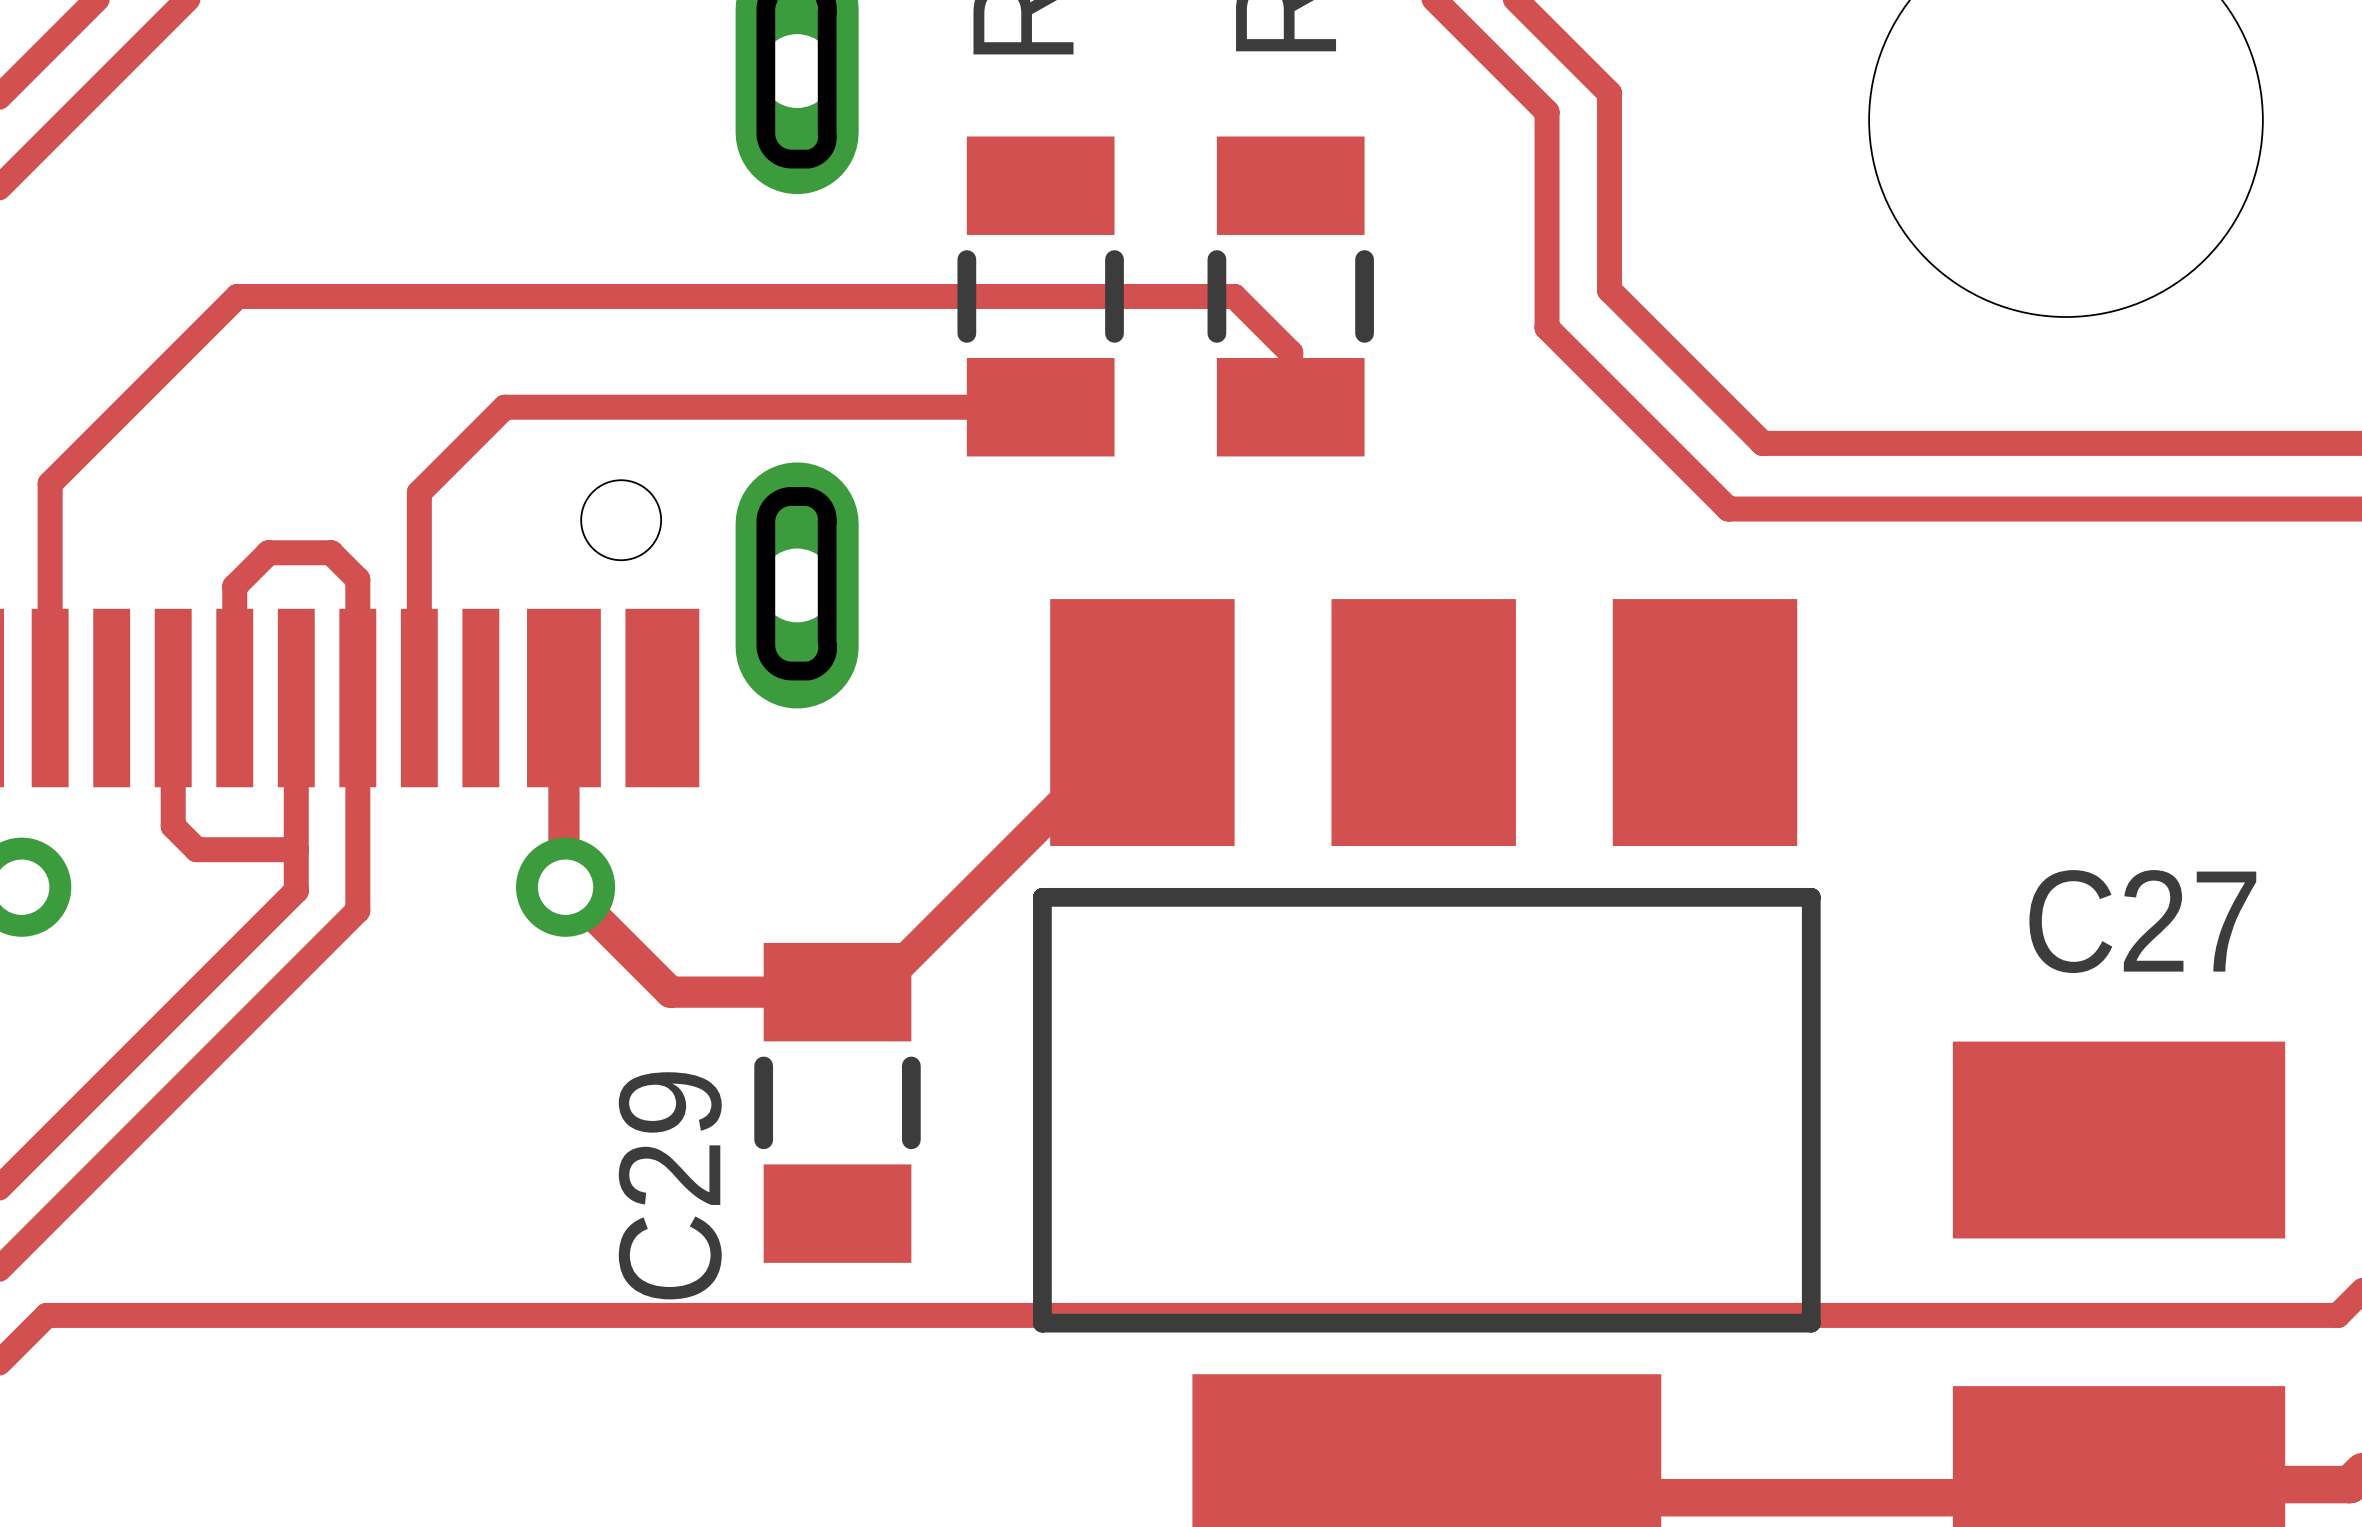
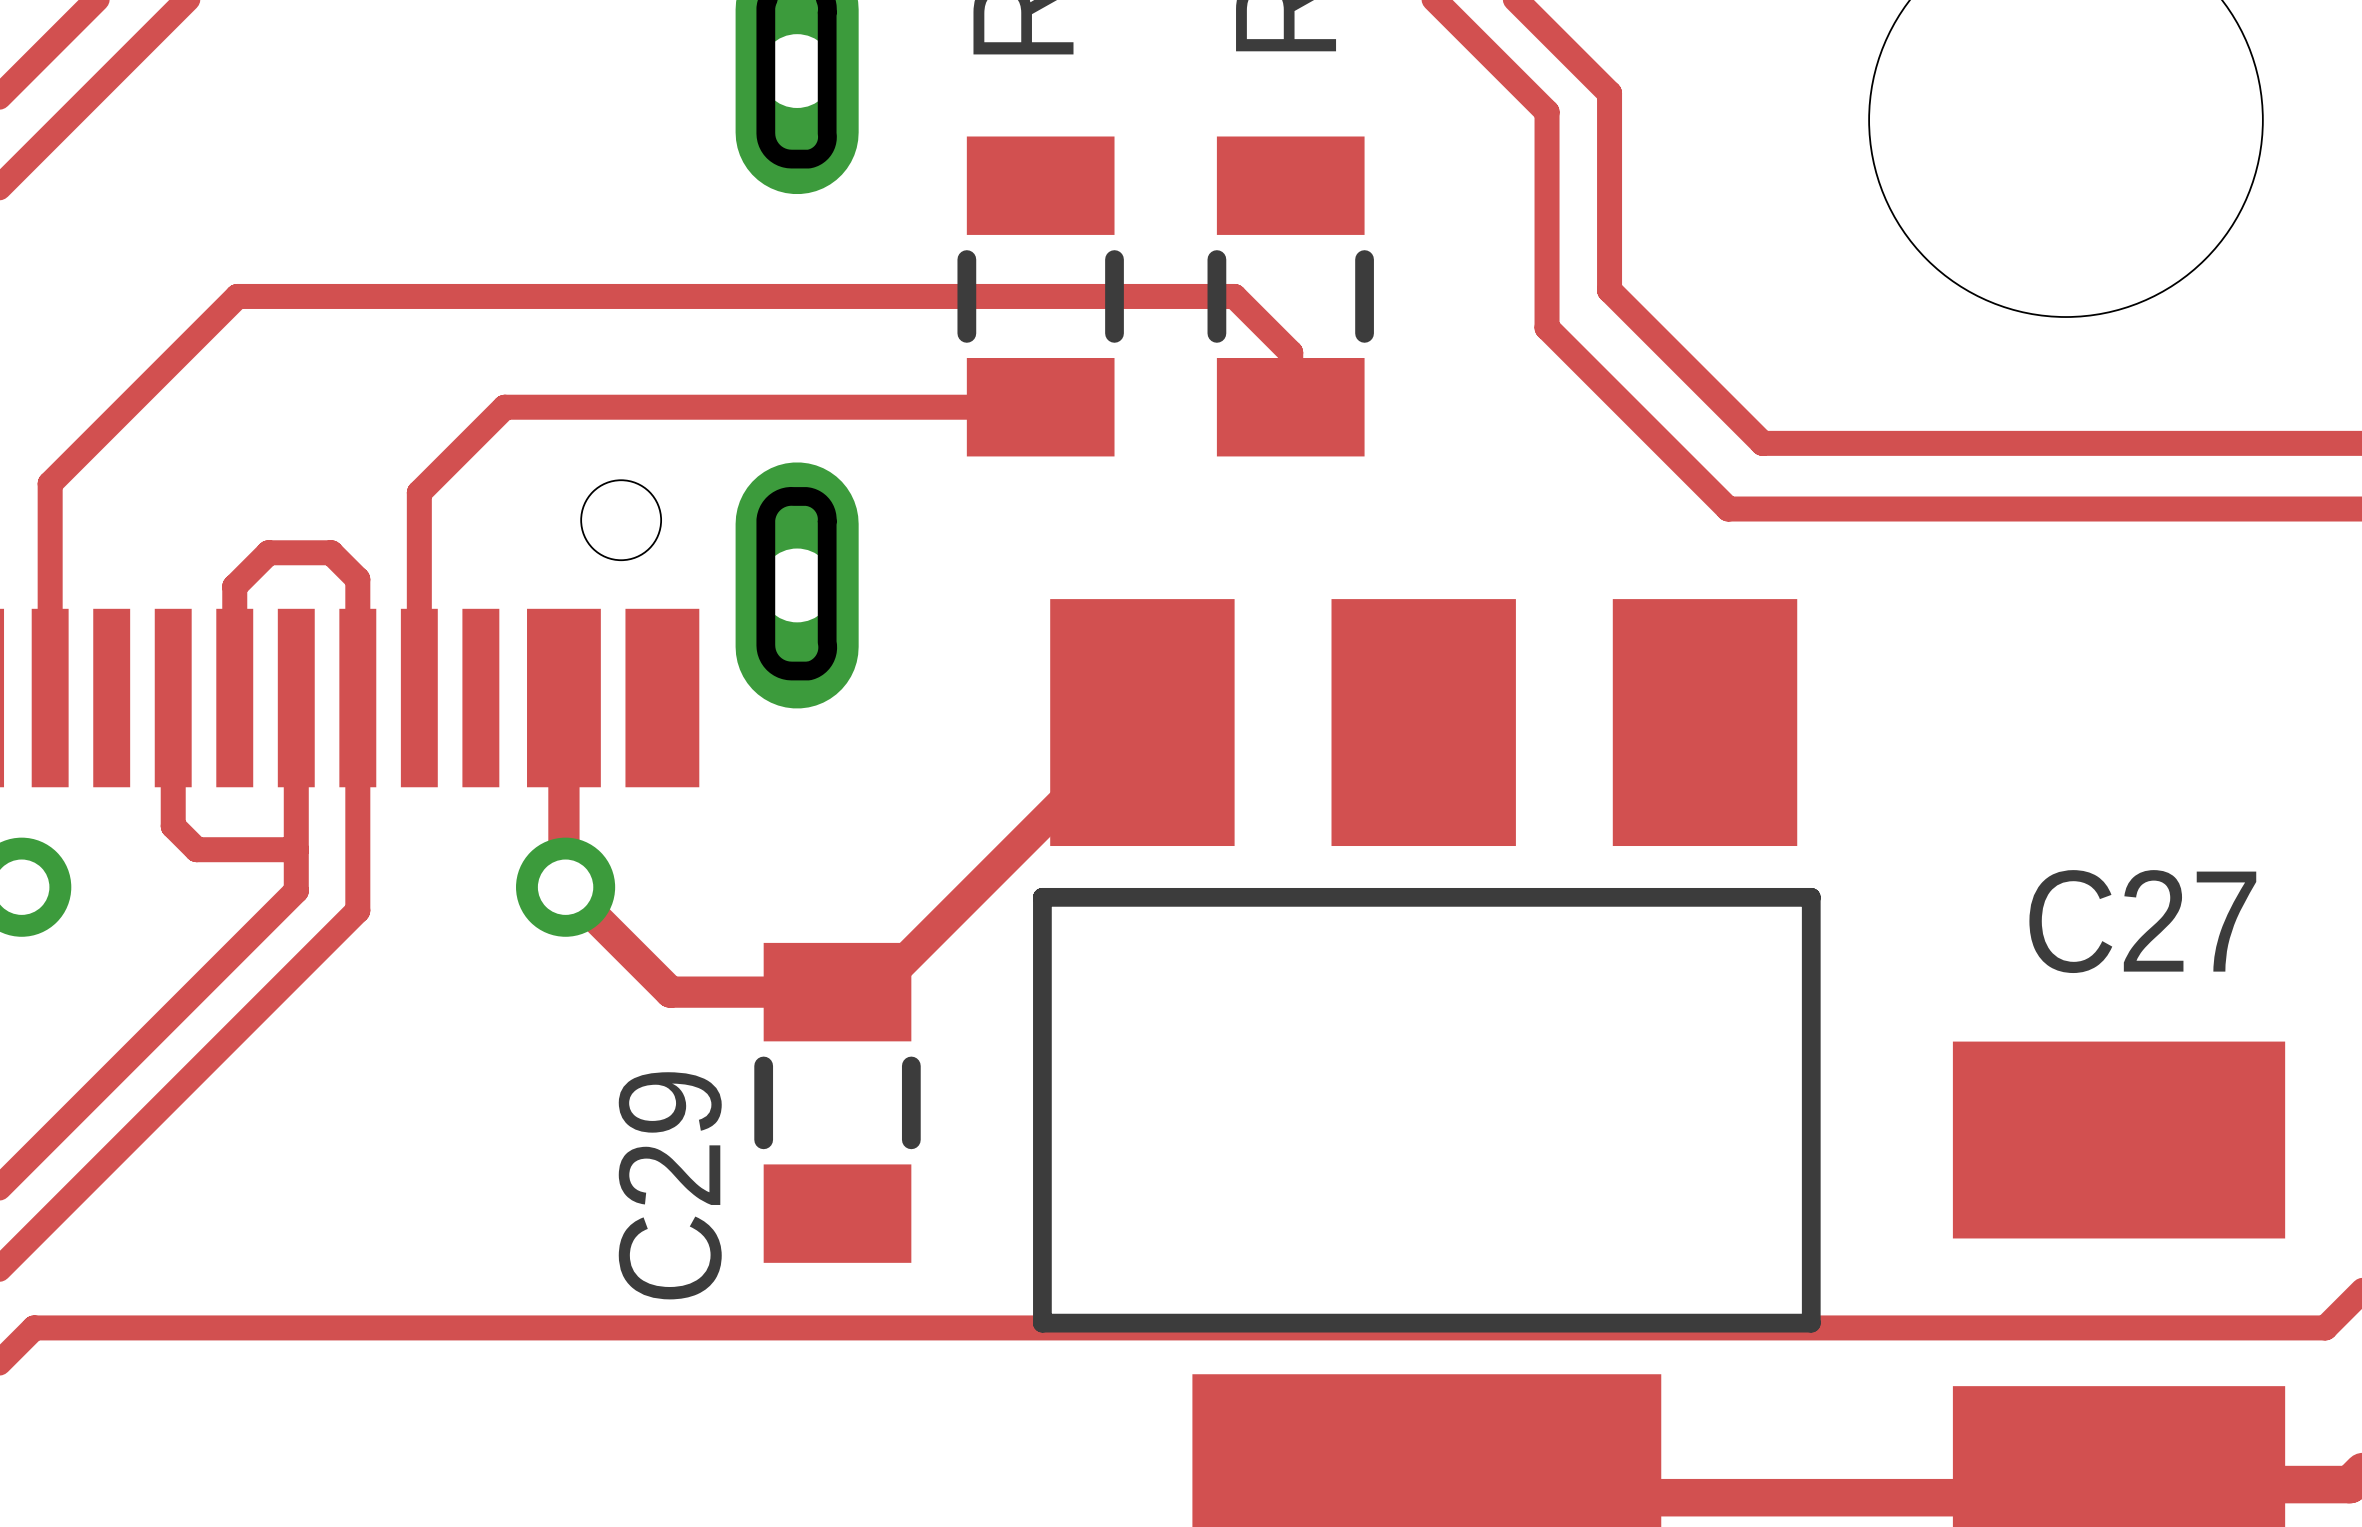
track: (2337, 1315) (46, 1315) (34, 1327) -> (2337, 1315) (2325, 1327) (34, 1327)

